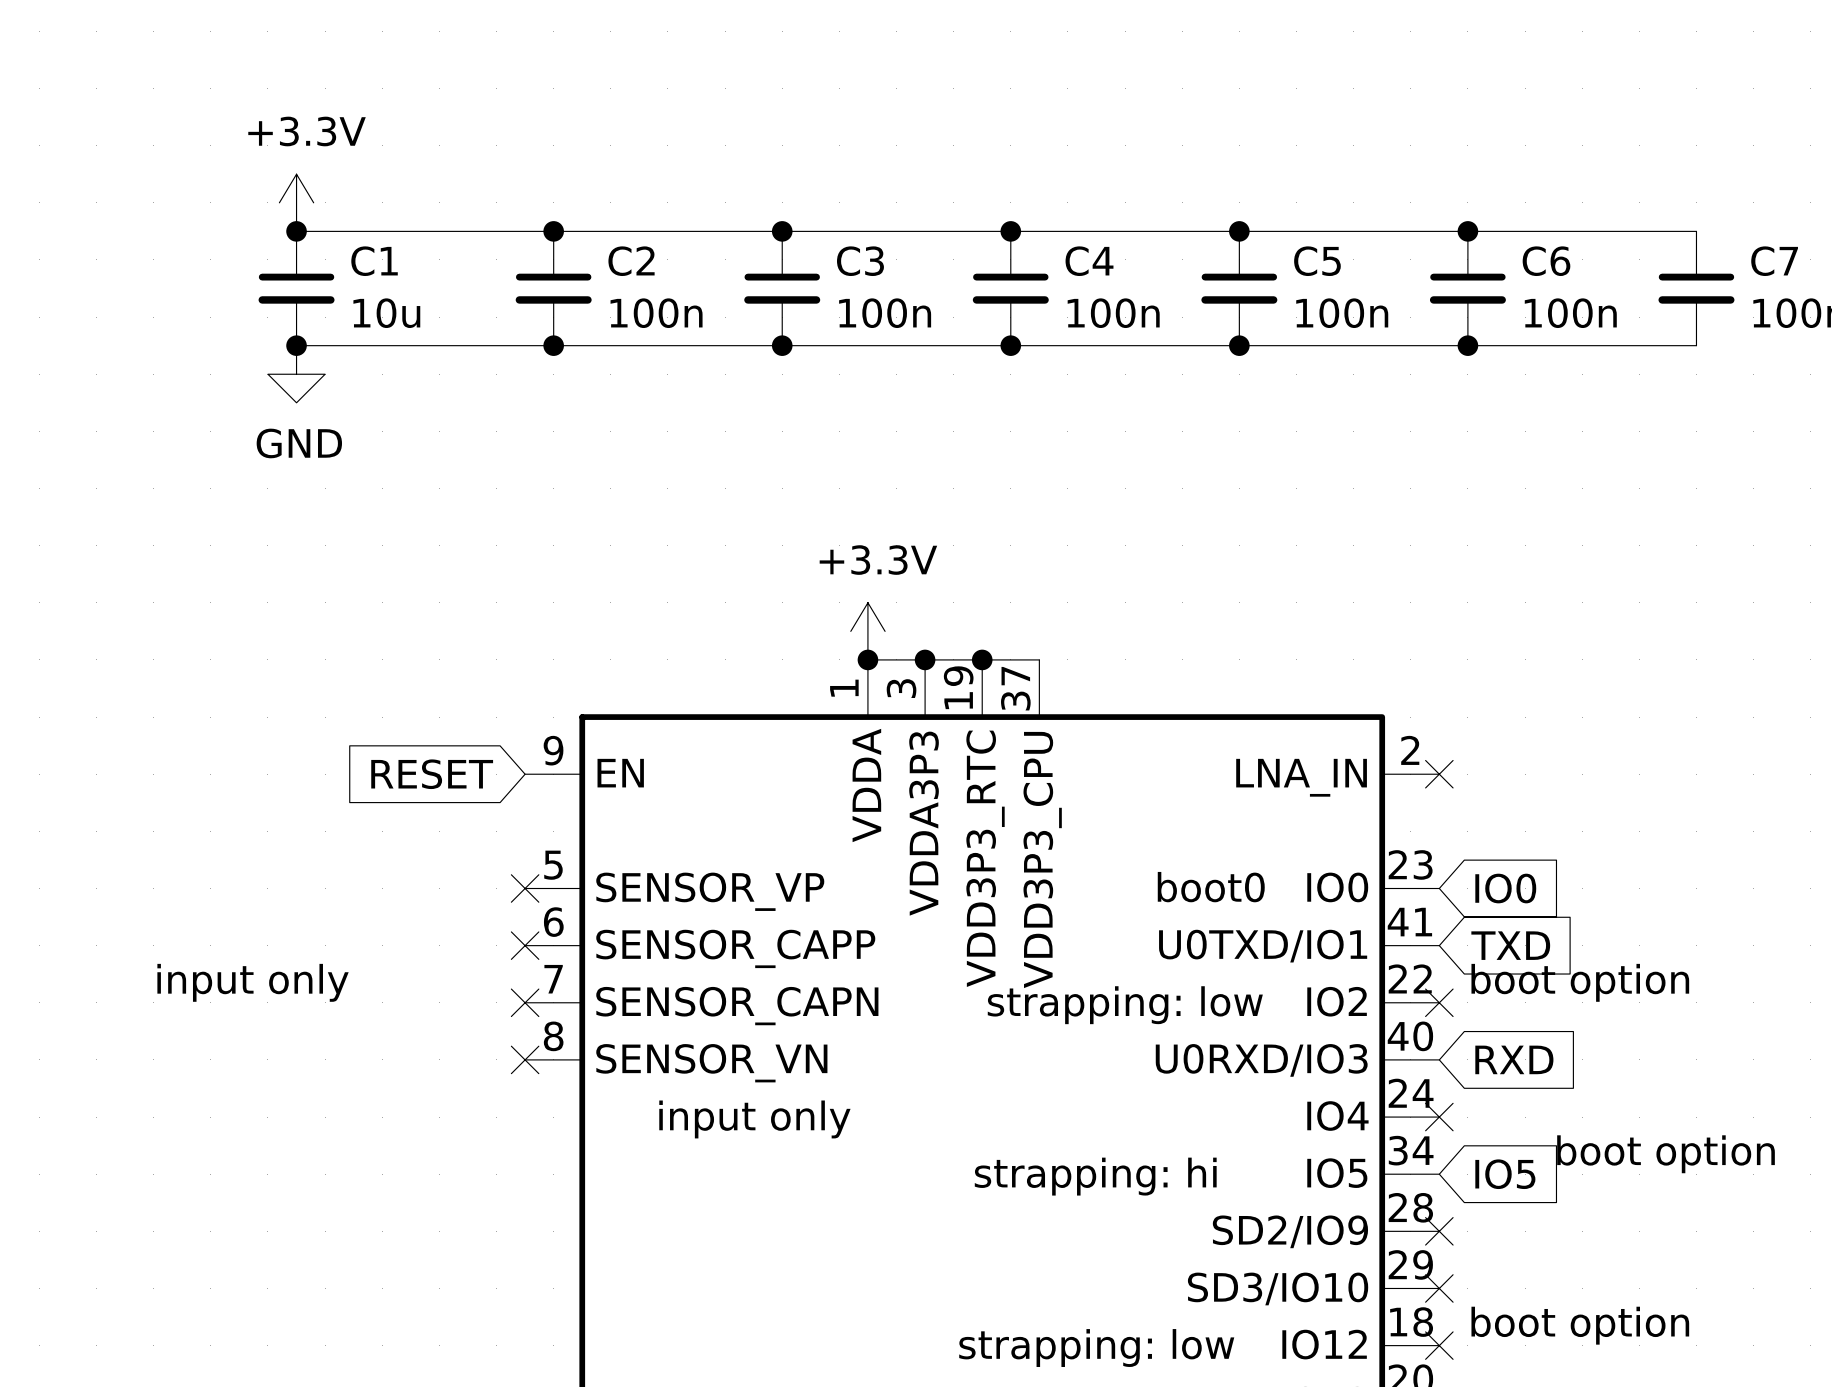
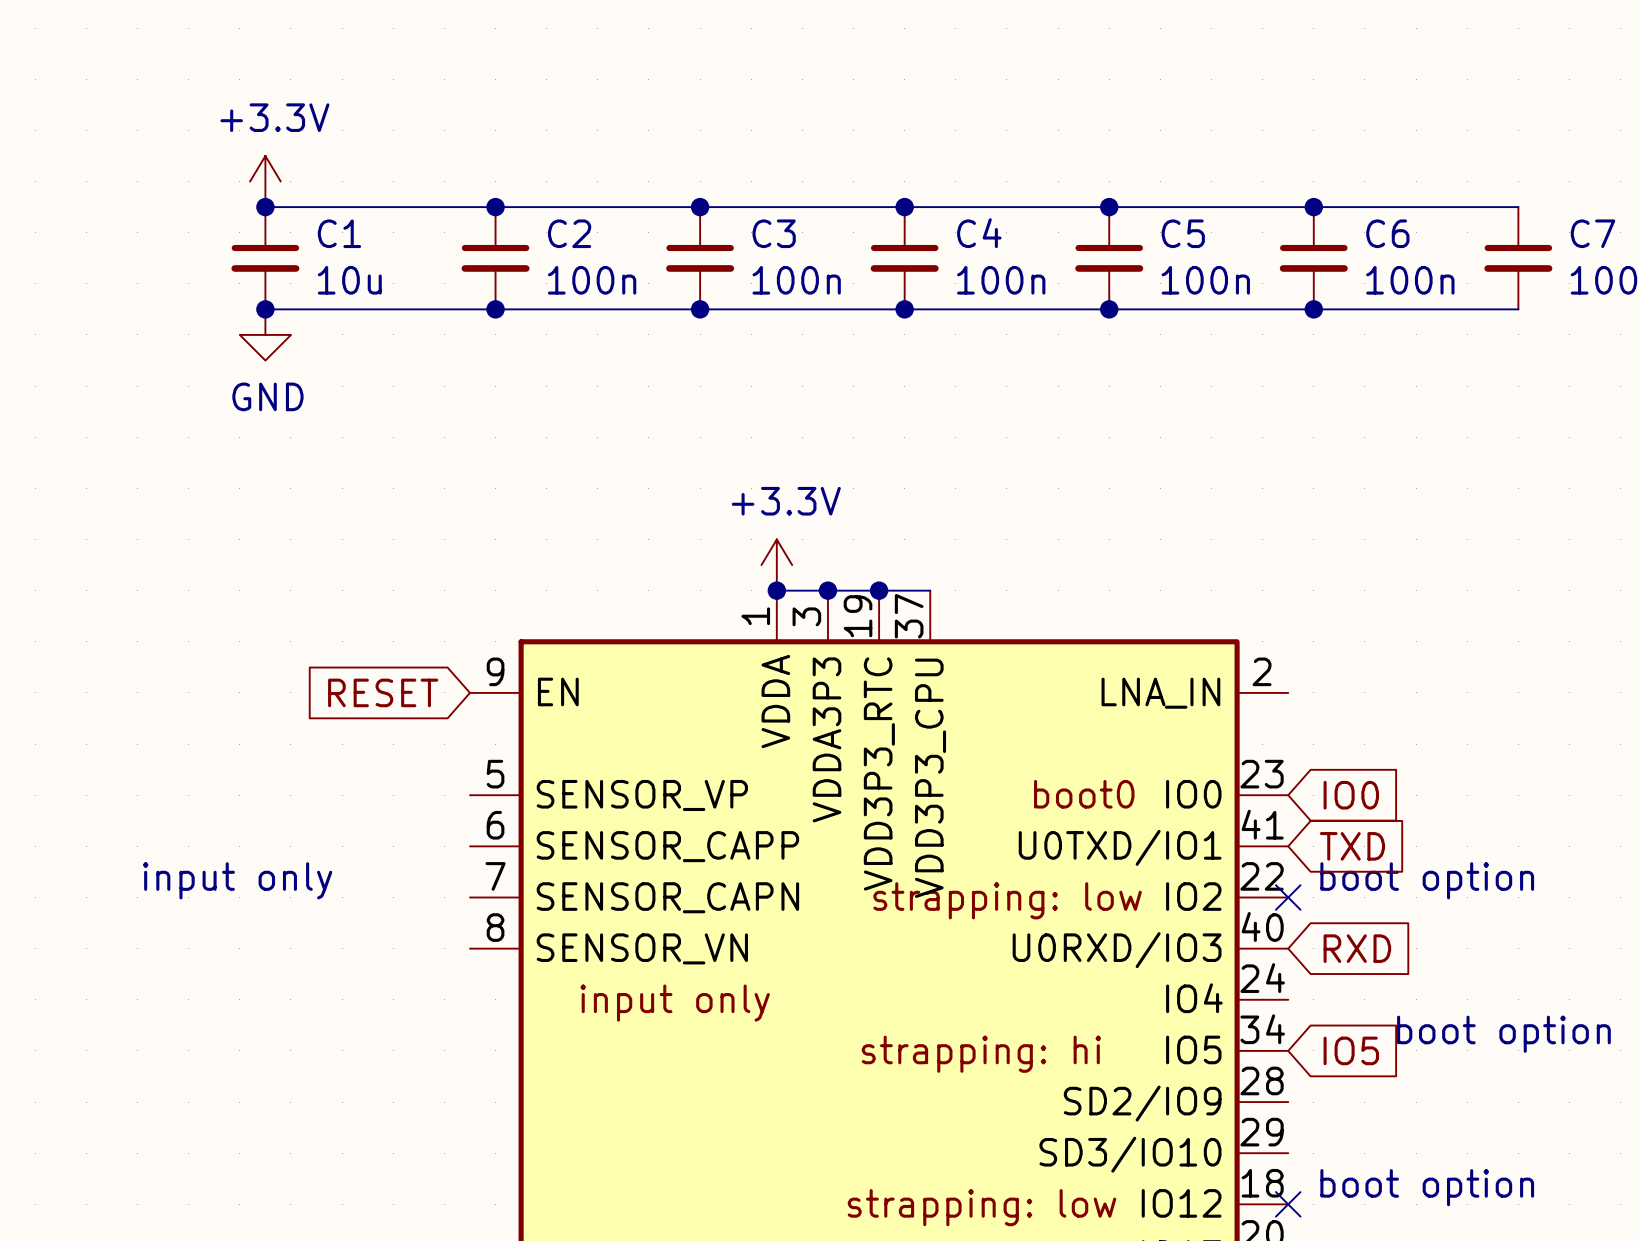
no-connect mark: (1439, 774) -> none
no-connect mark: (525, 888) -> none
no-connect mark: (525, 945) -> none
no-connect mark: (525, 1002) -> none
no-connect mark: (525, 1059) -> none
no-connect mark: (1439, 1117) -> none
no-connect mark: (1439, 1231) -> none
no-connect mark: (1439, 1288) -> none

